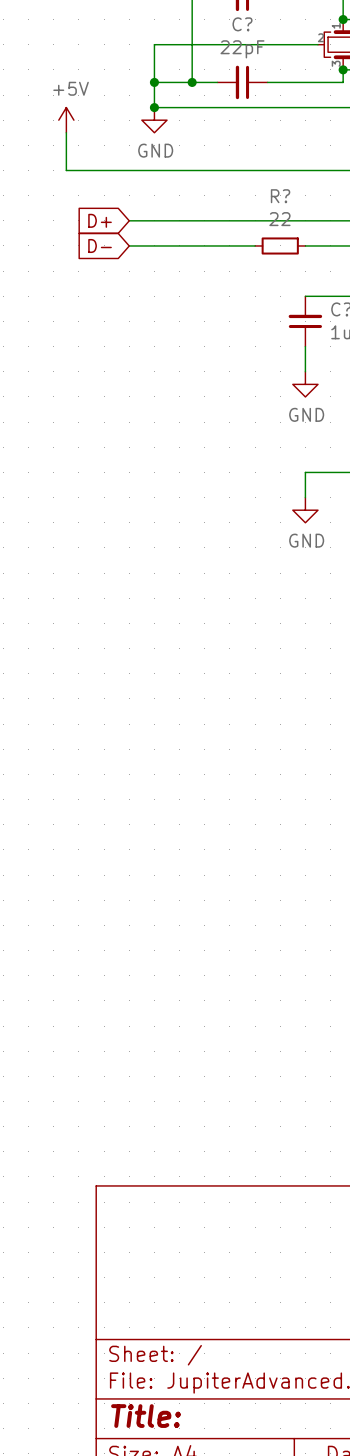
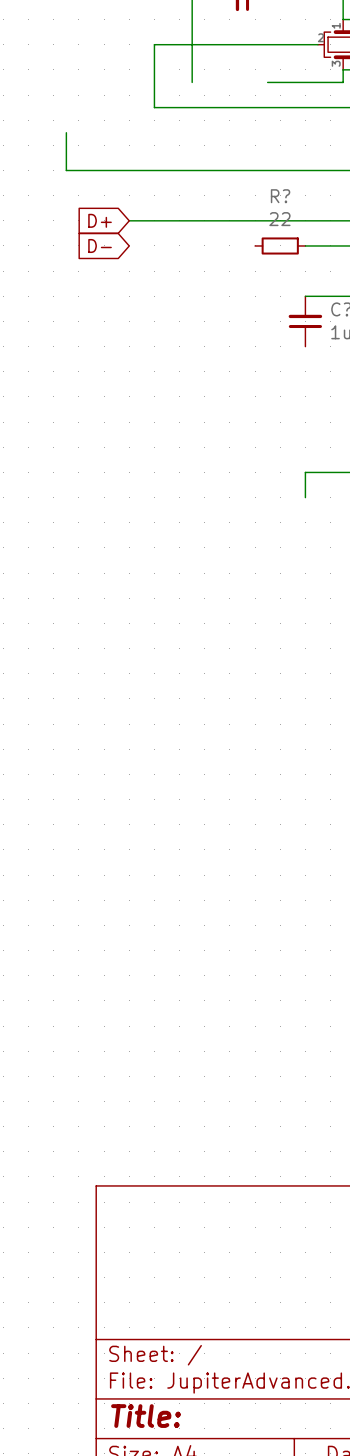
junction: (343, 19) -> none
junction: (343, 69) -> none
wire: (154, 82) (217, 82) -> none
junction: (154, 82) -> none
junction: (192, 82) -> none
C?: 22pF (242, 82) -> none
junction: (154, 107) -> none
power symbol: +5V (66, 120) -> none
power symbol: GND (154, 120) -> none
wire: (129, 245) (255, 245) -> none
wire: (305, 346) (305, 371) -> none
power symbol: GND (305, 384) -> none
power symbol: GND (305, 510) -> none

